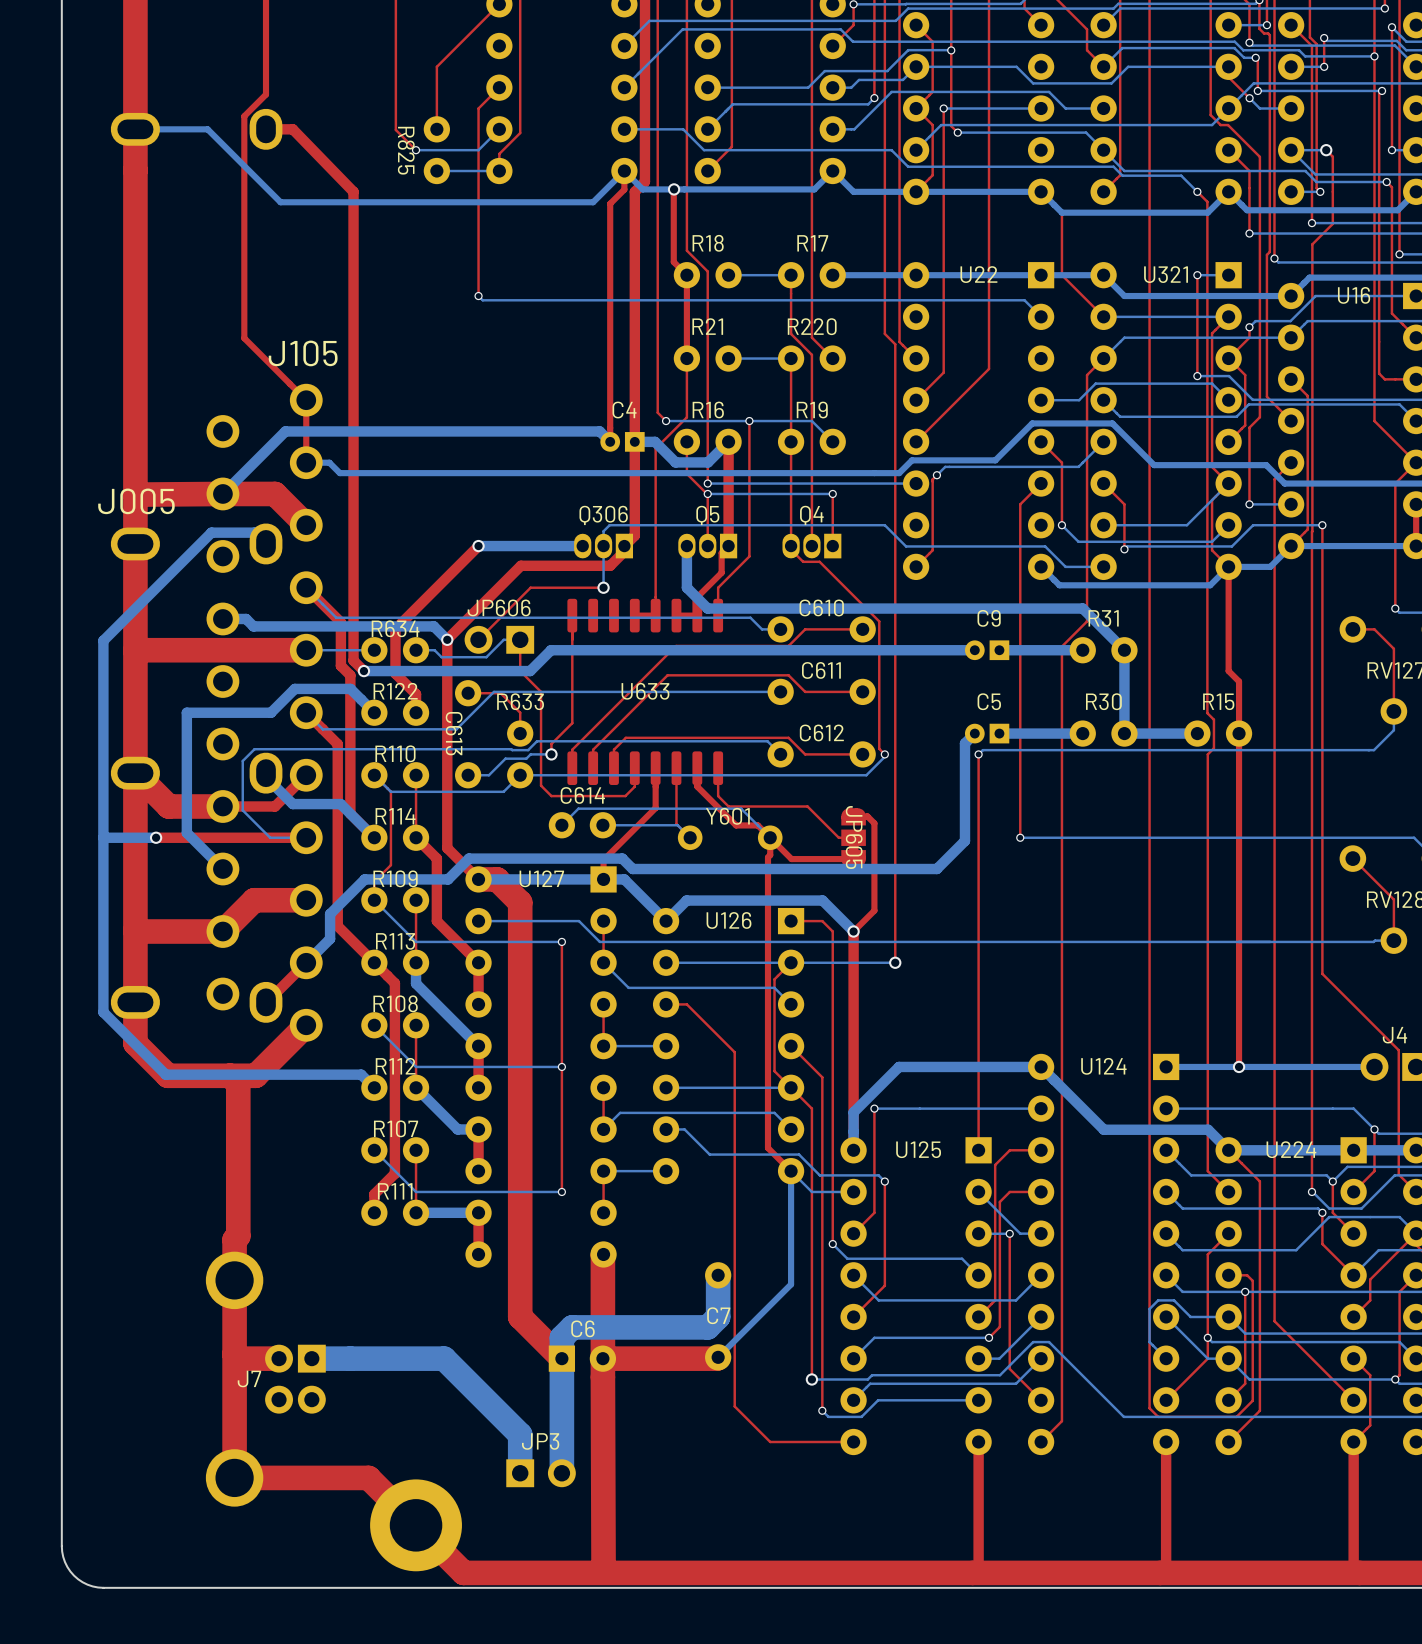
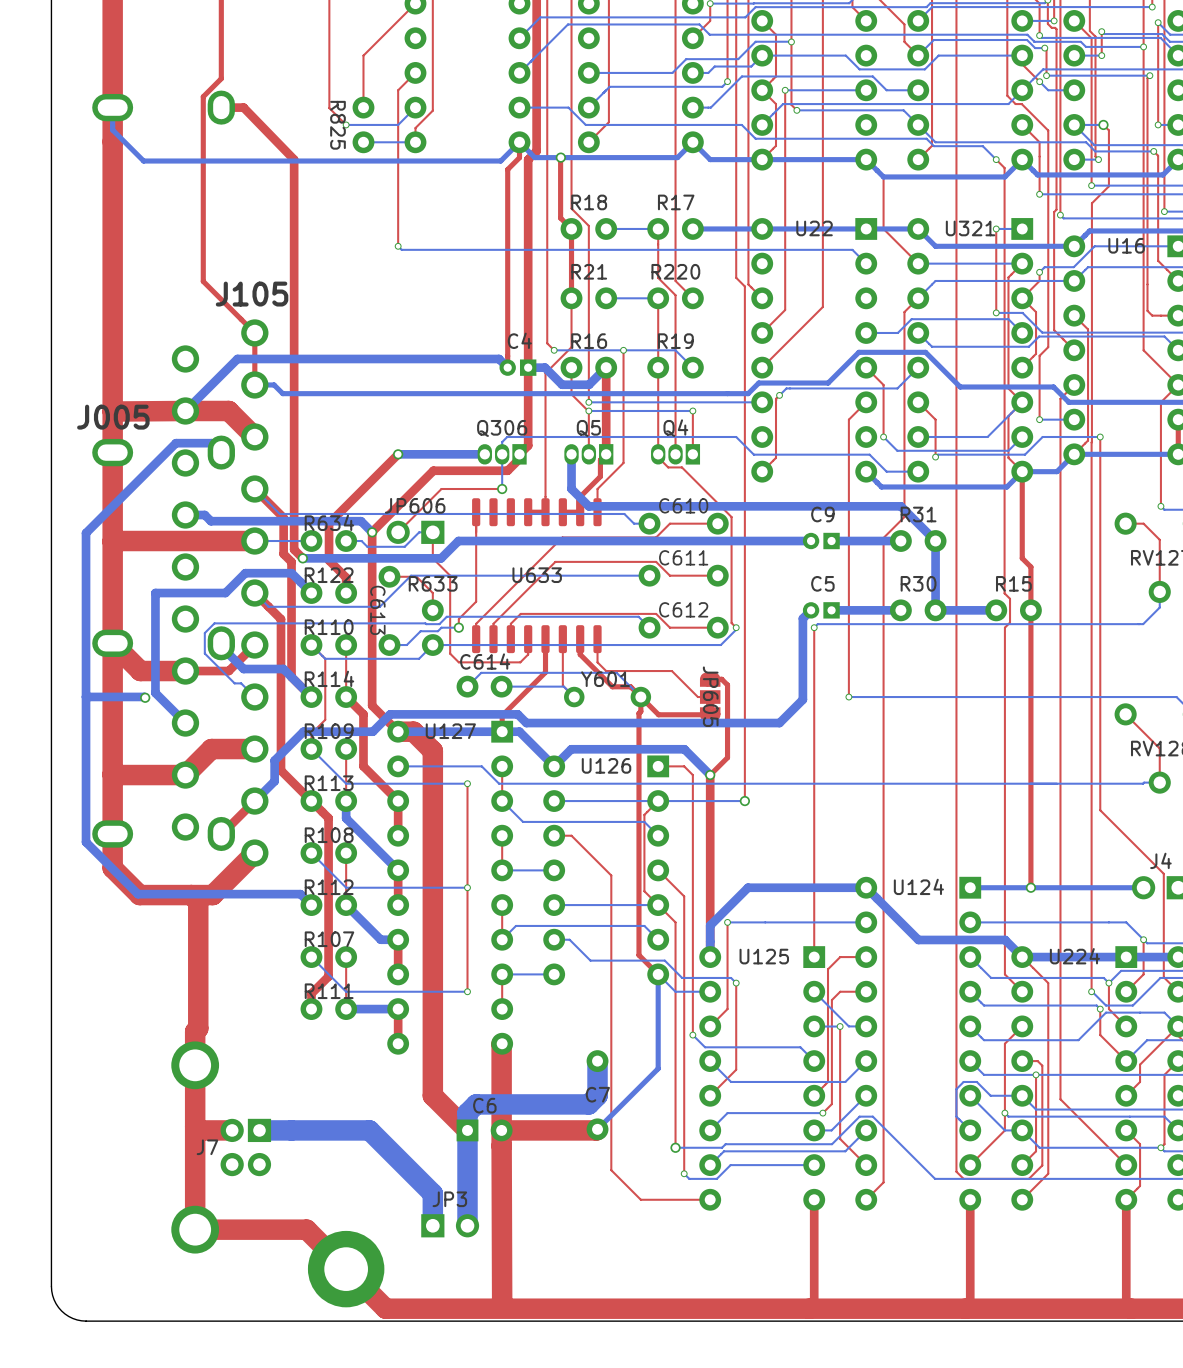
bottom track: (135, 129) (207, 129) (280, 202) (593, 202) (601, 193) -> (112, 107) (112, 130) (143, 161) (500, 161)
bottom track: (257, 749) (254, 749) (242, 760) (242, 810) (270, 837) (306, 837) -> (214, 623) (204, 633) (204, 653) (234, 683) (241, 683) (254, 697)
bottom track: (156, 837) (103, 837) -> (145, 697) (86, 696)
via position: (156, 837) -> (145, 697)
top track: (306, 837) (156, 837) -> none

